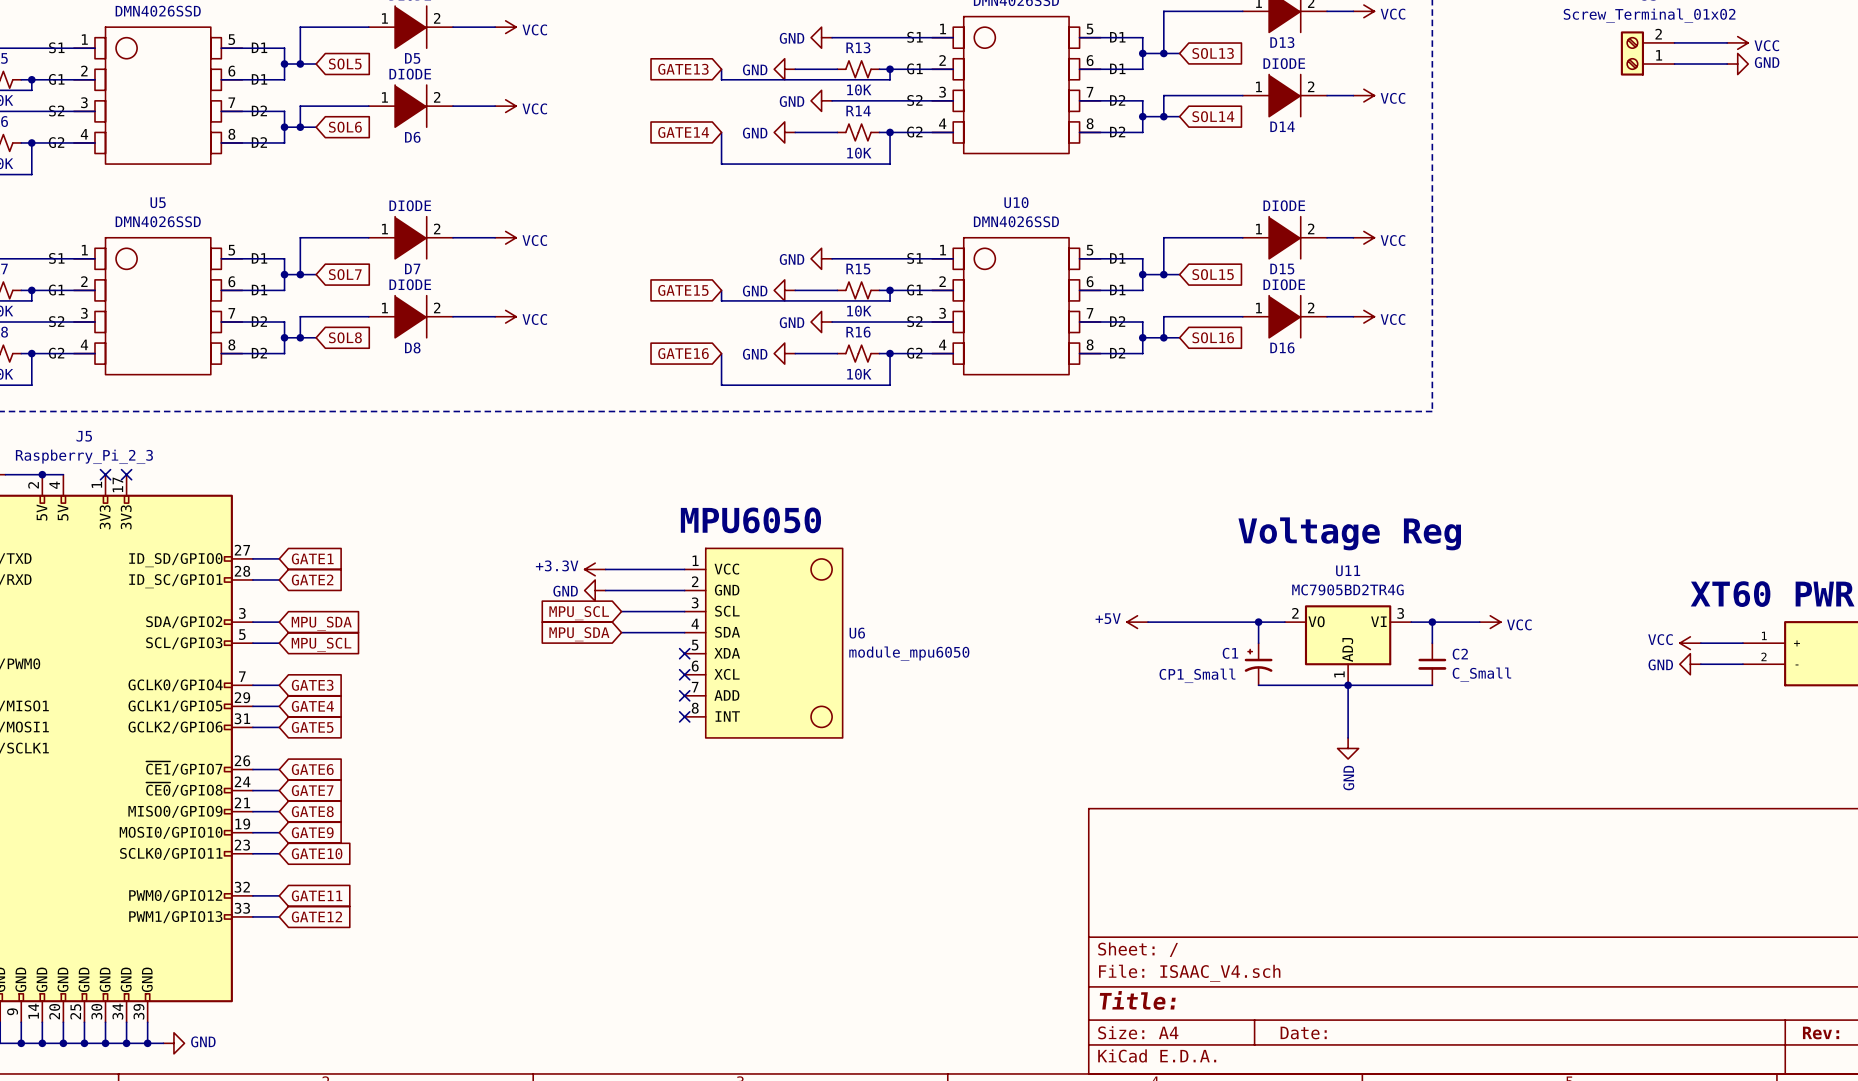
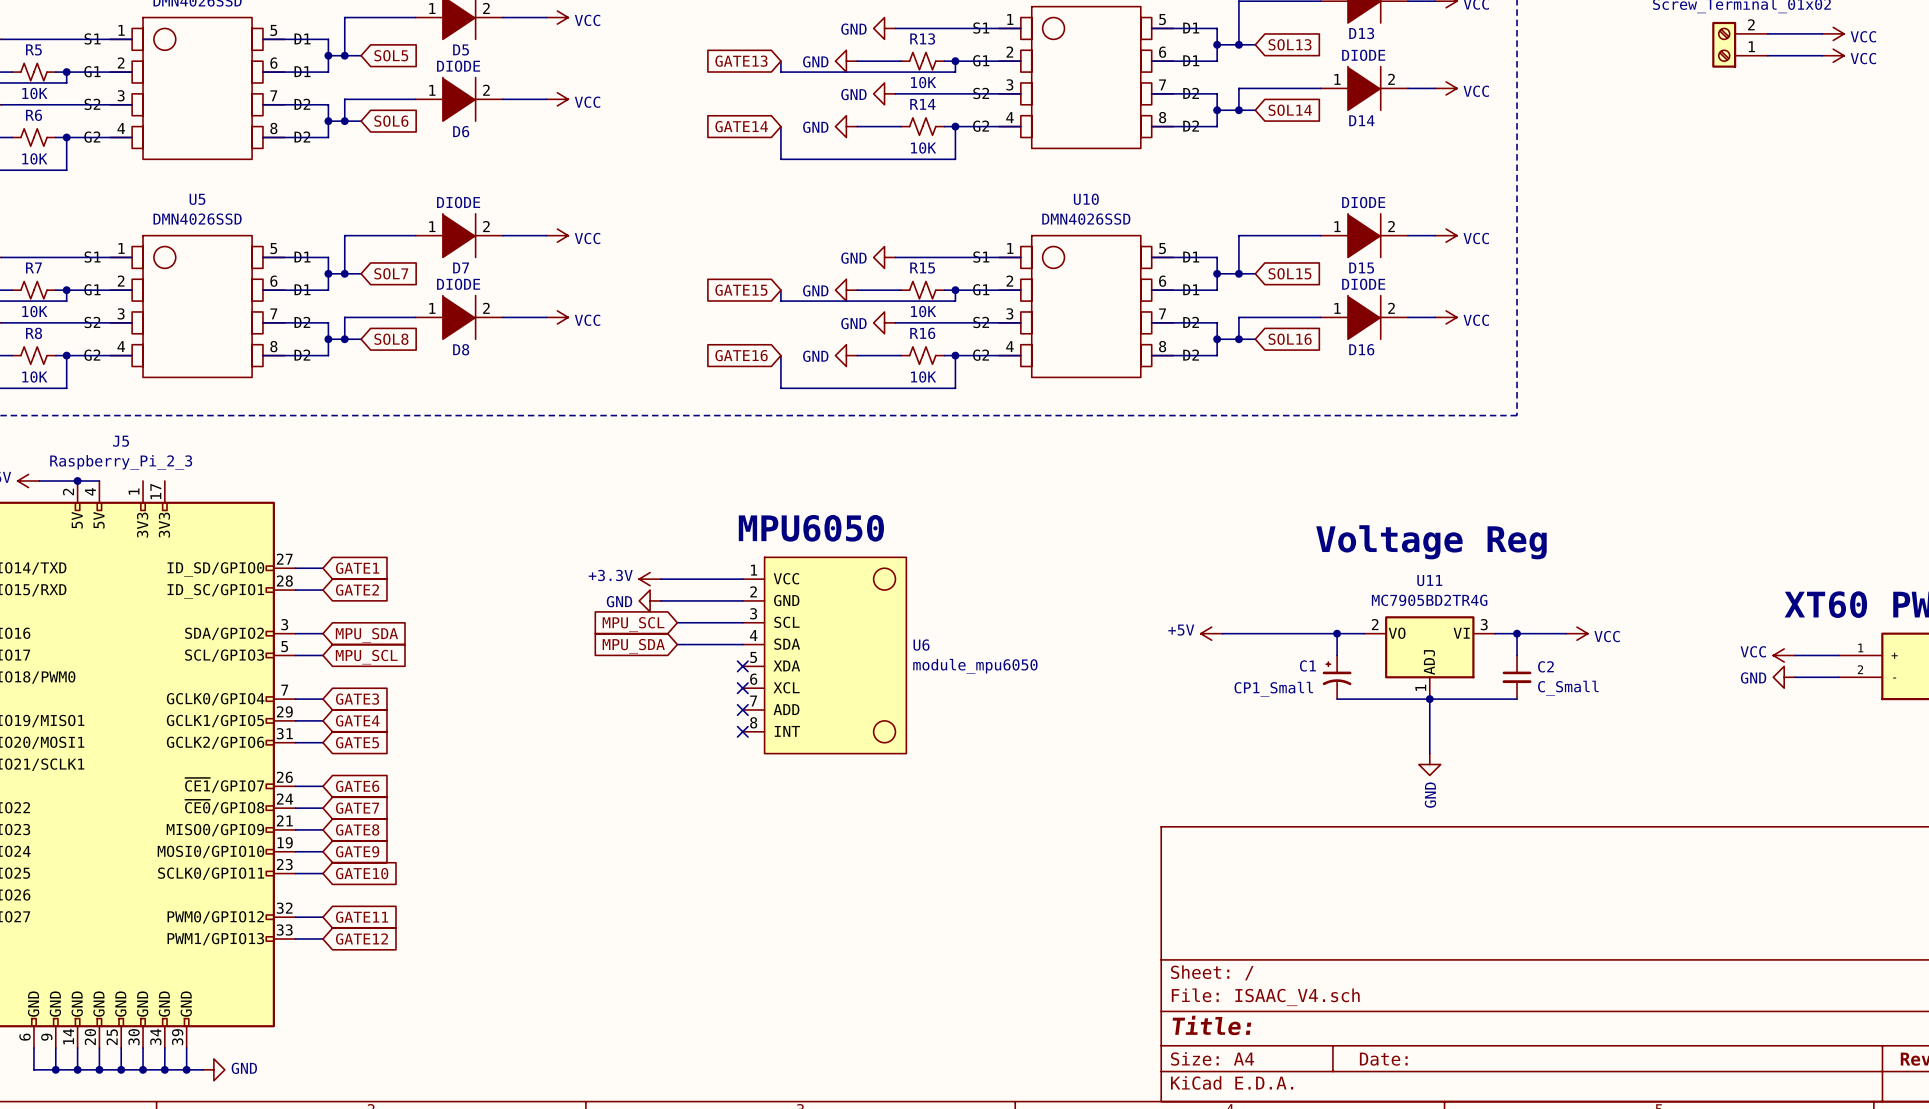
power symbol: GND (1737, 64) -> VCC (1833, 55)
no-connect mark: (105, 474) -> none
no-connect mark: (126, 474) -> none

